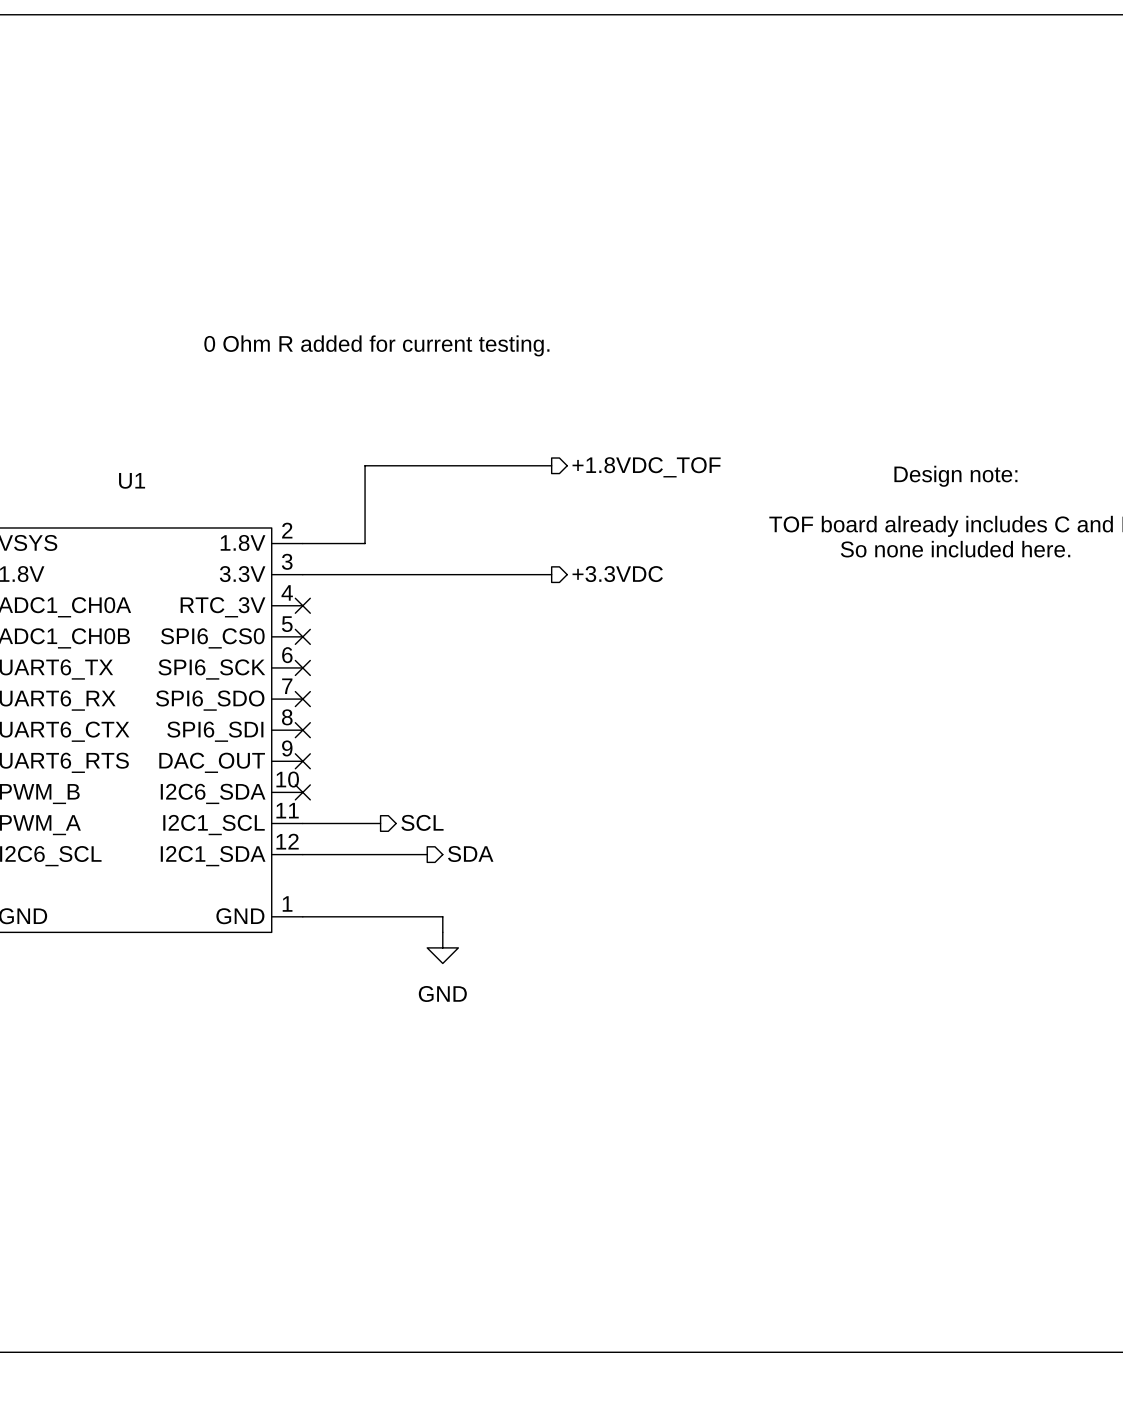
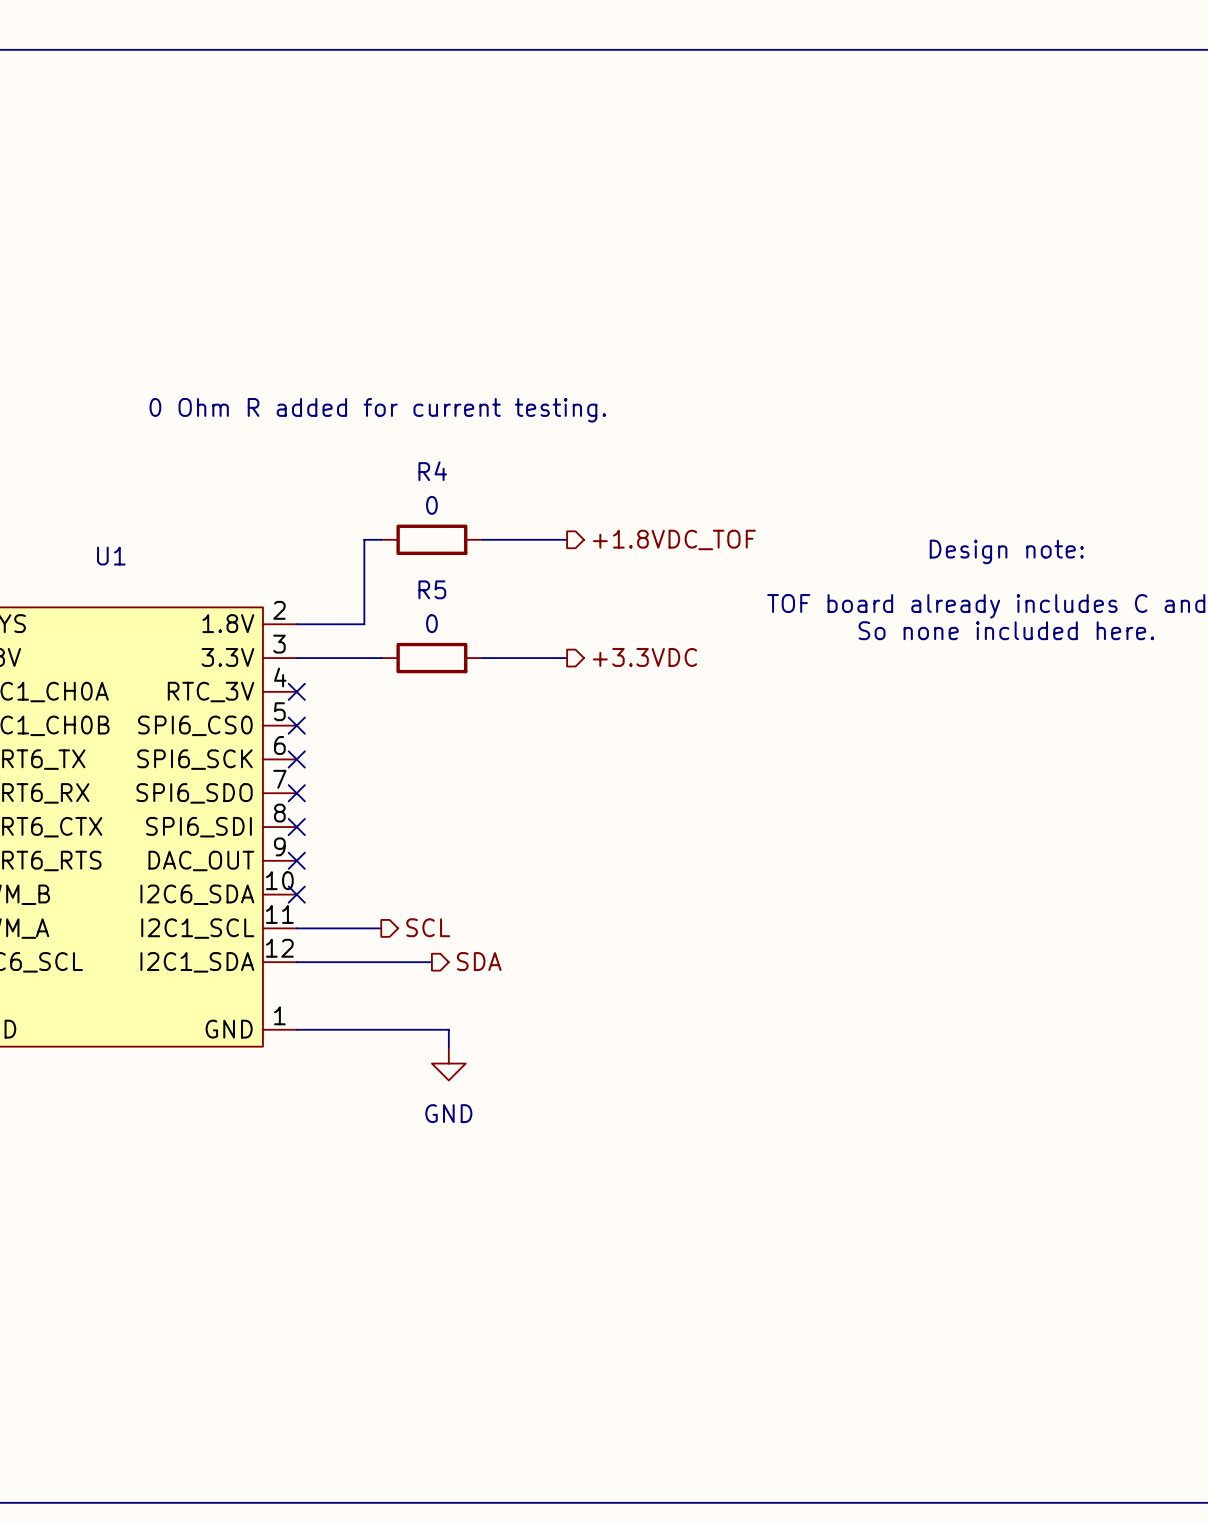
wire: (380, 465) (473, 465) -> none
R4: none -> 0 (431, 539)
wire: (380, 574) (473, 574) -> none
R5: none -> 0 (431, 658)

